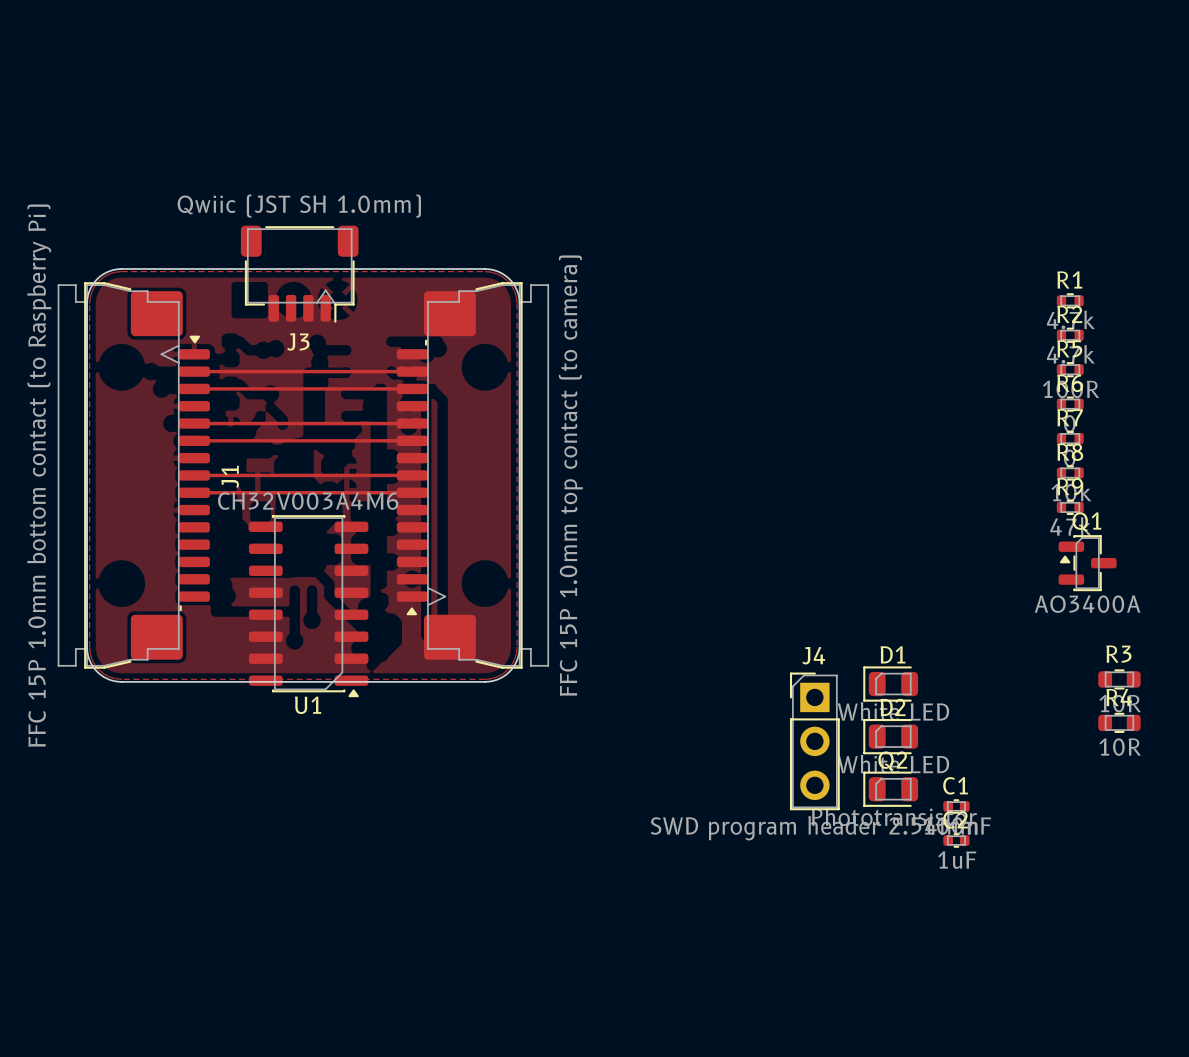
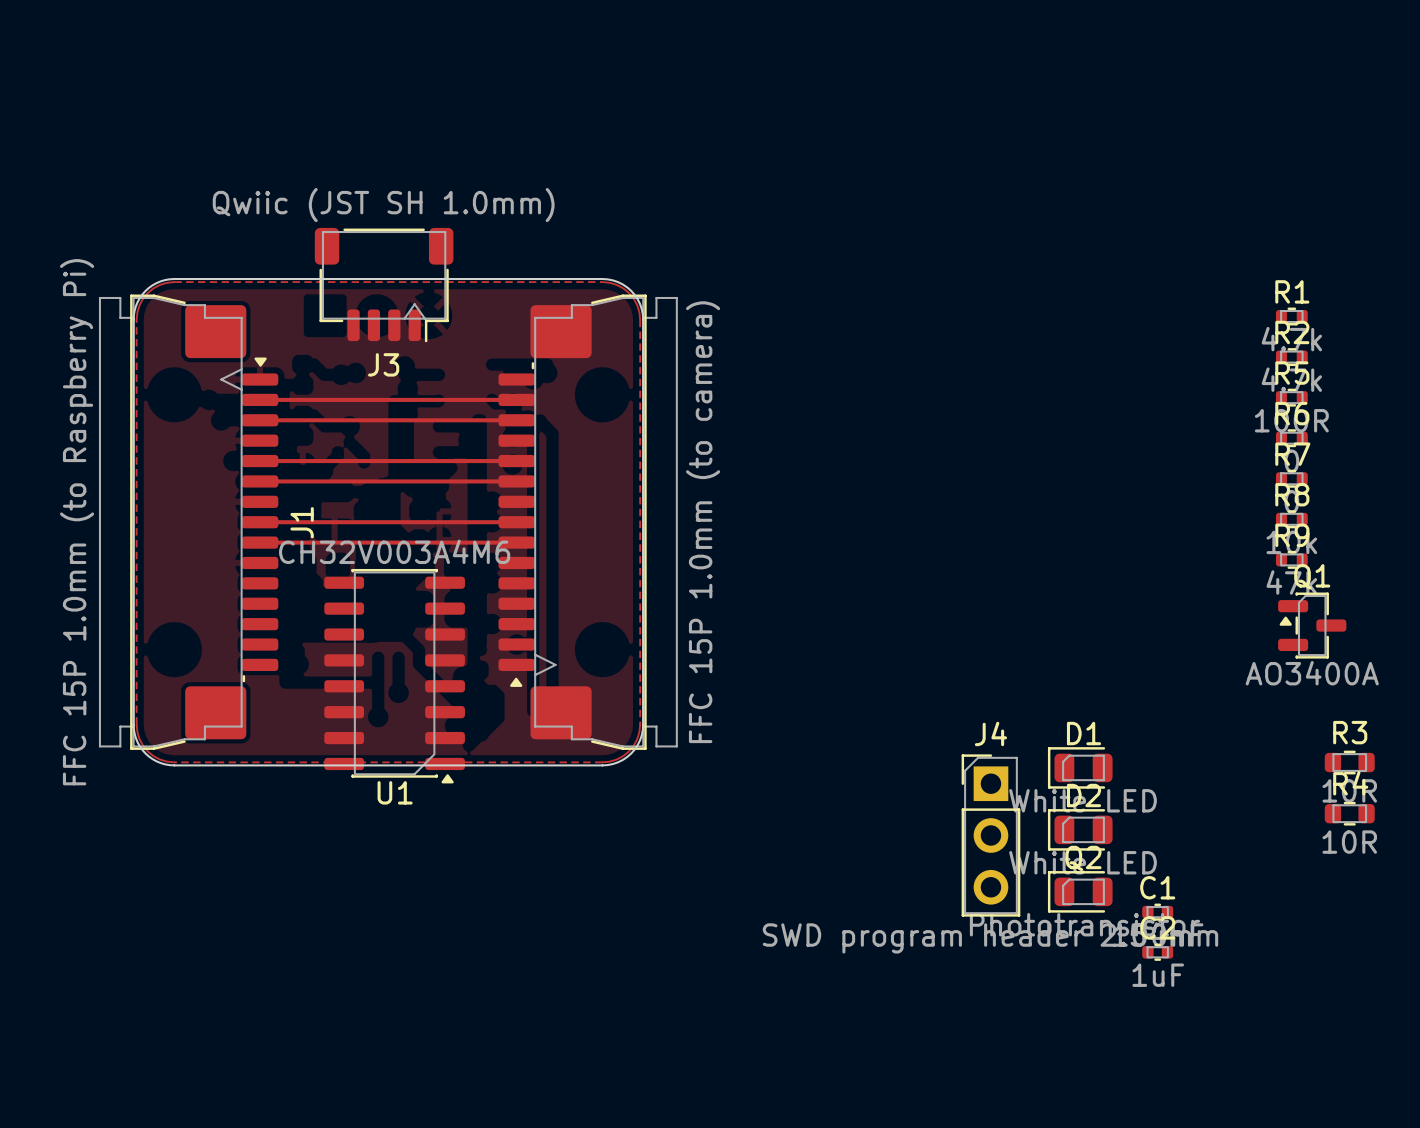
J1 value: FFC 15P 1.0mm bottom contact (to Raspberry Pi) (39, 475) -> FFC 15P 1.0mm (to Raspberry Pi) (77, 522)
part value: FFC 15P 1.0mm top contact (to camera) (570, 475) -> FFC 15P 1.0mm (to camera) (703, 522)

